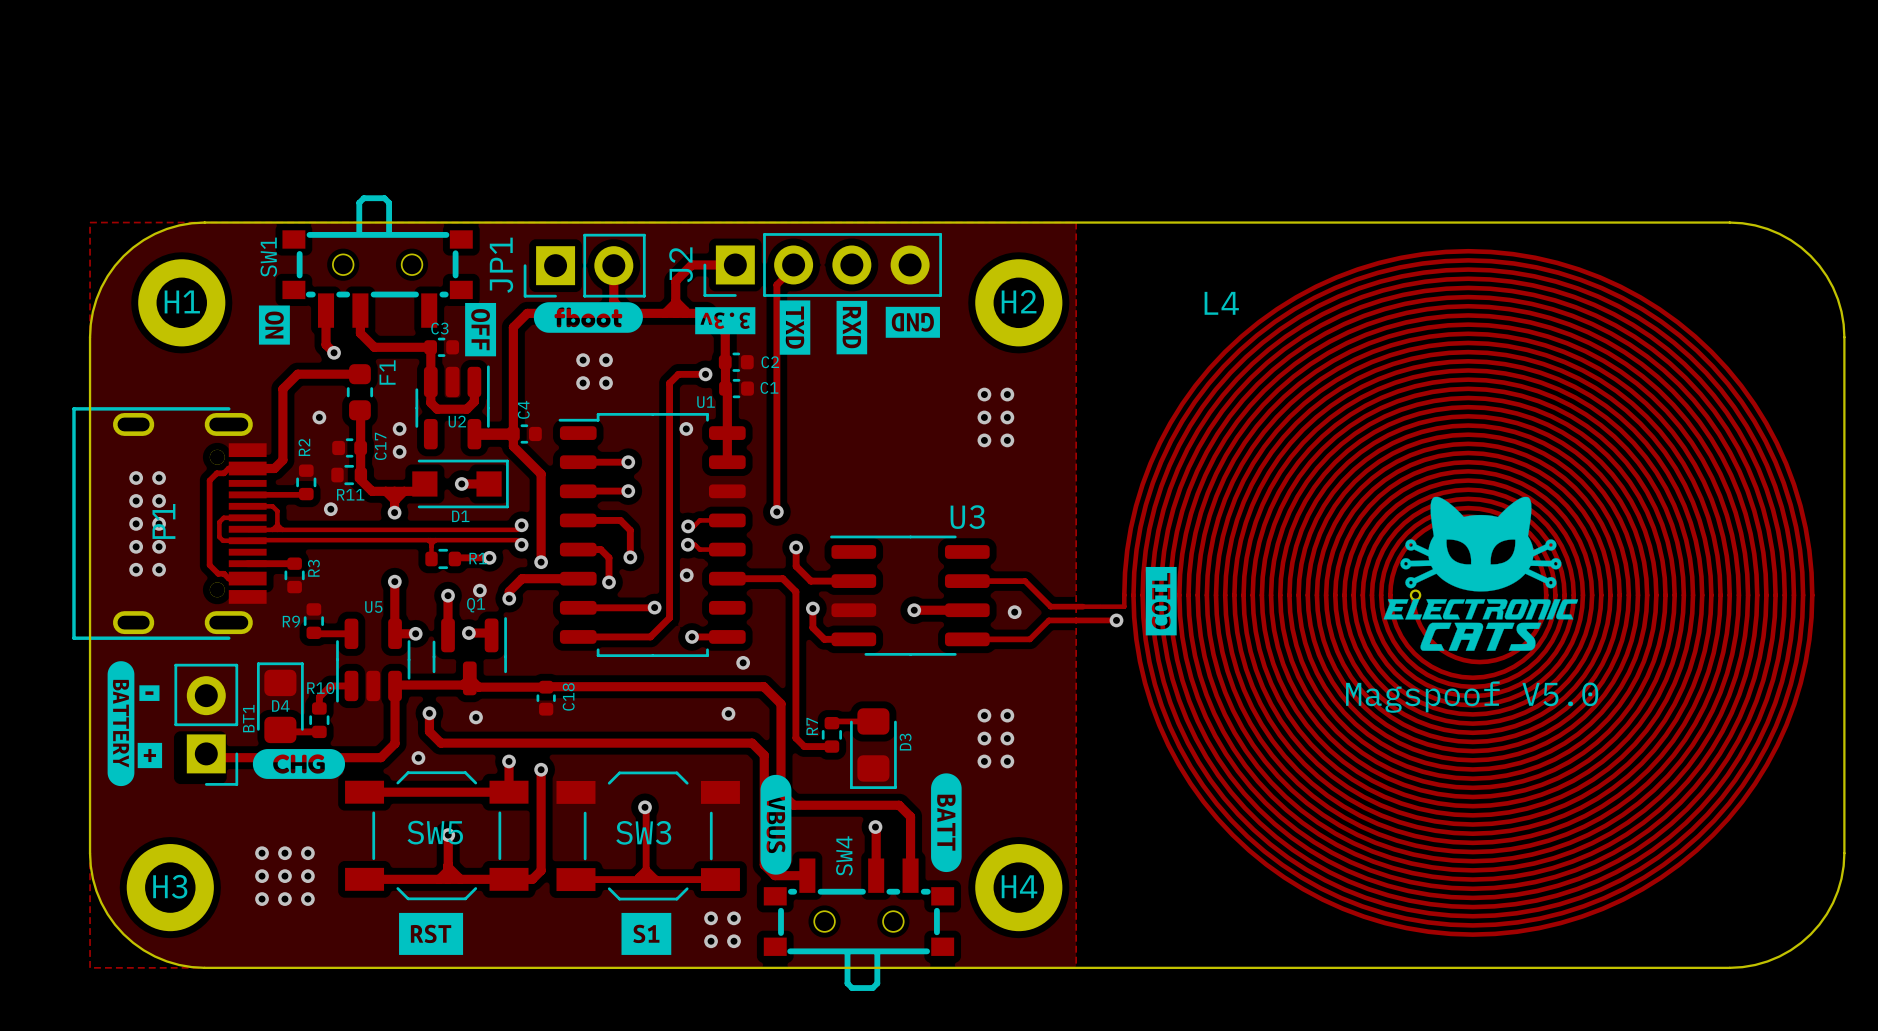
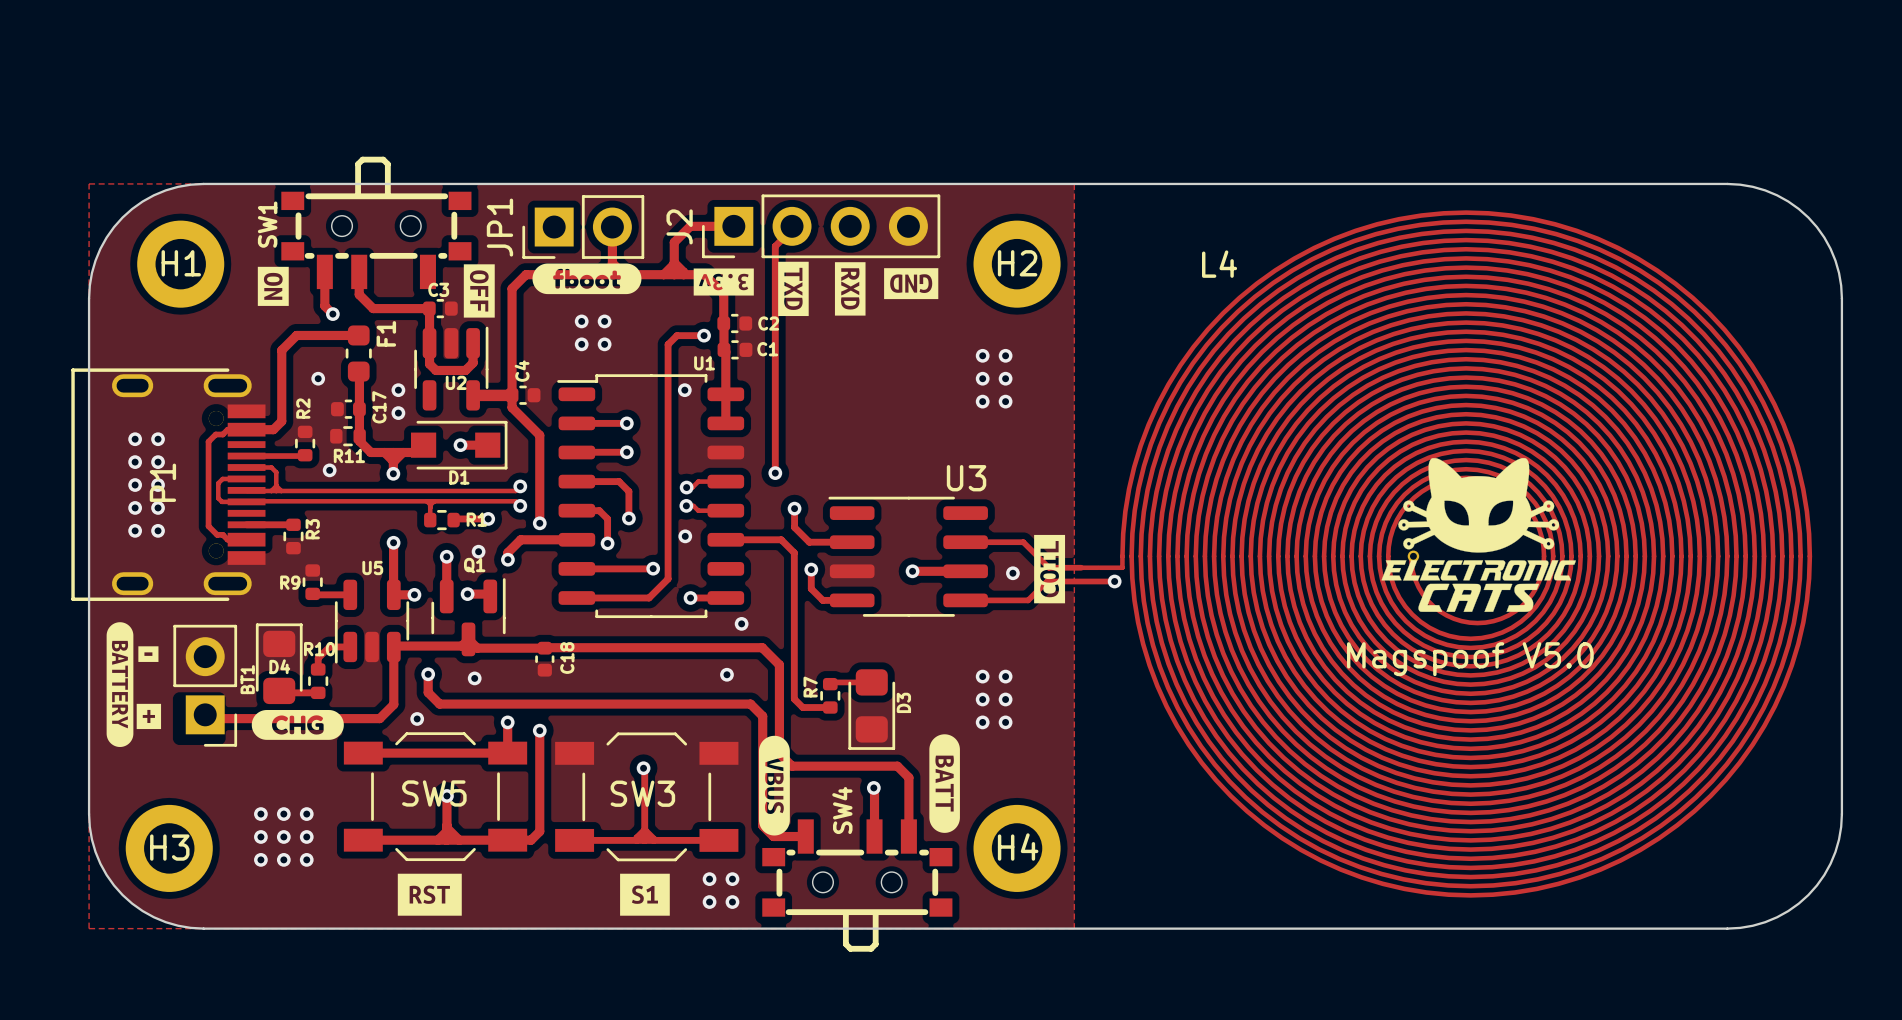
drawing position: (1161, 601) -> (1049, 569)

